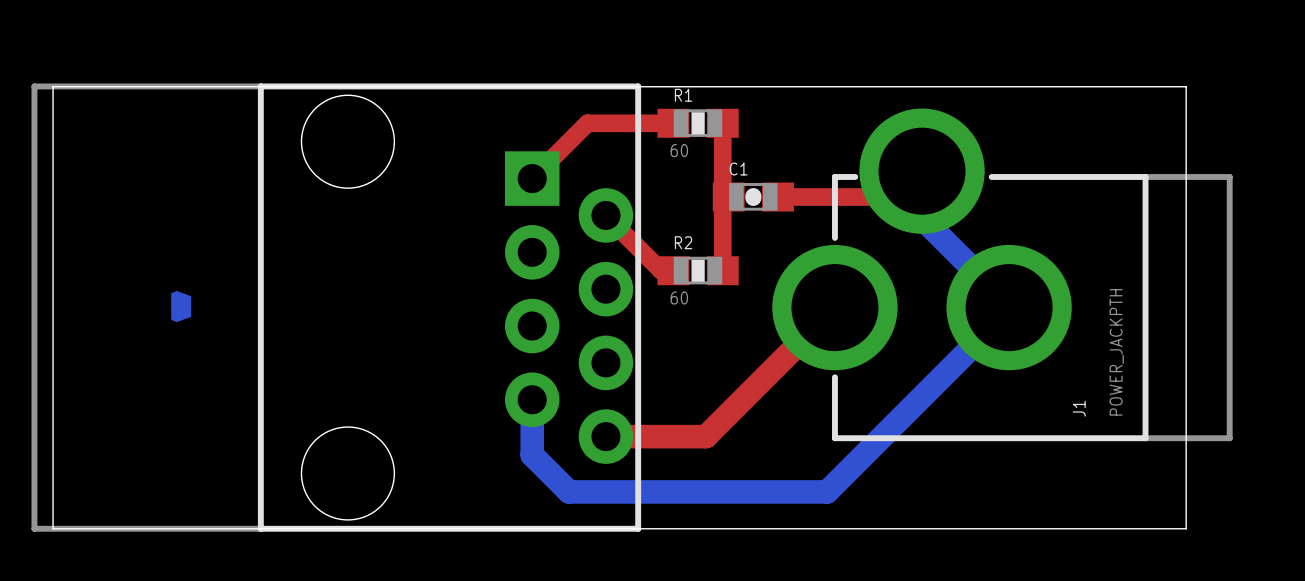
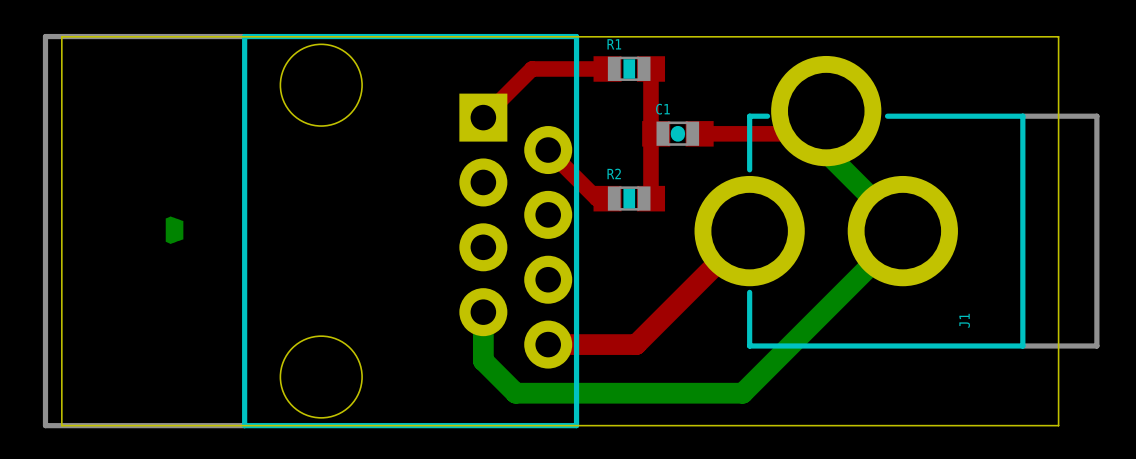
R1 value: 60 (679, 150) -> none
R2 value: 60 (679, 298) -> none
J1 value: POWER_JACKPTH (1116, 352) -> none

